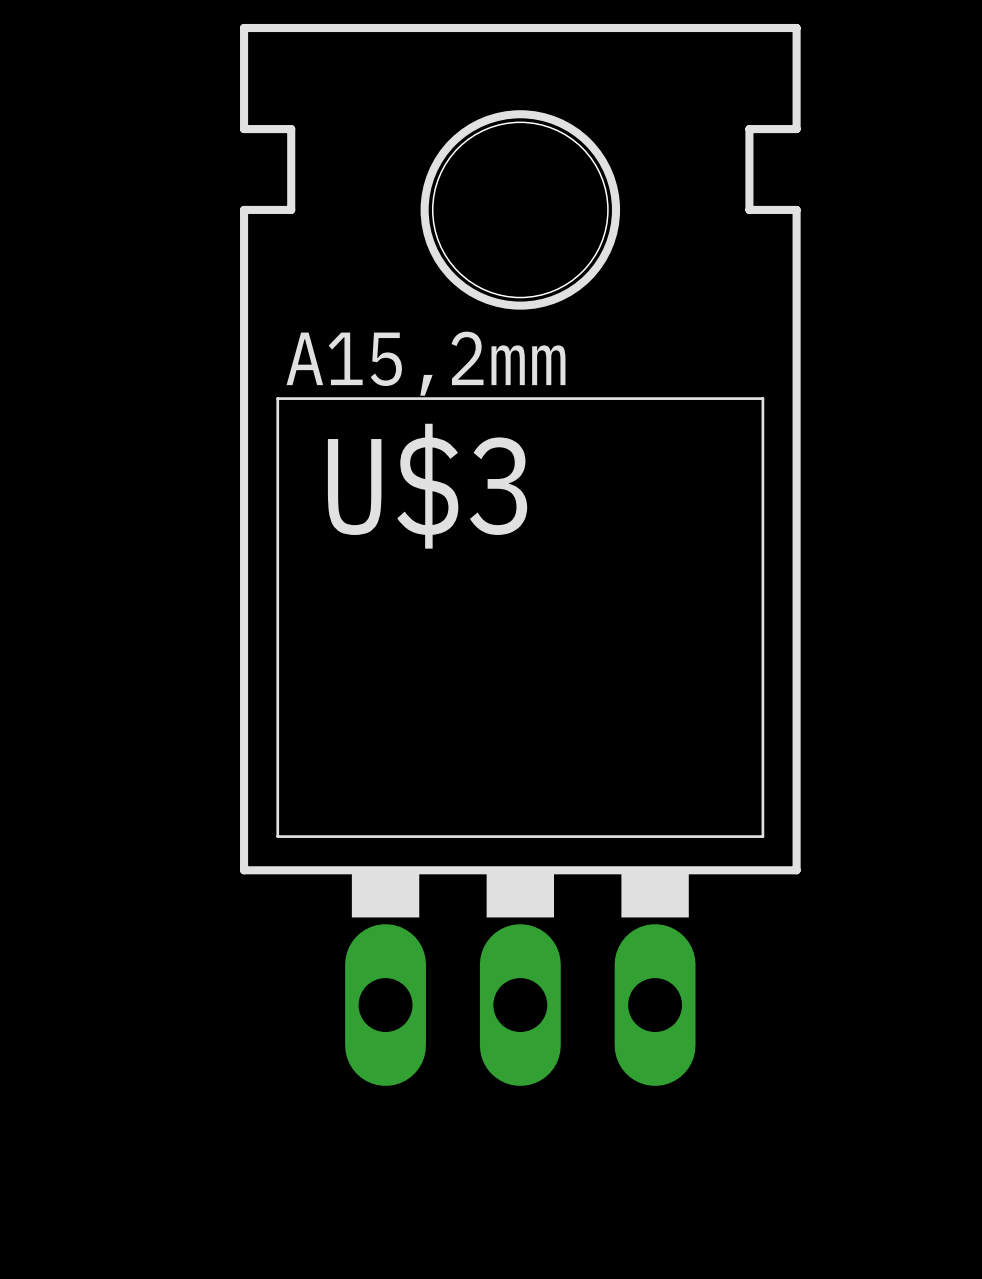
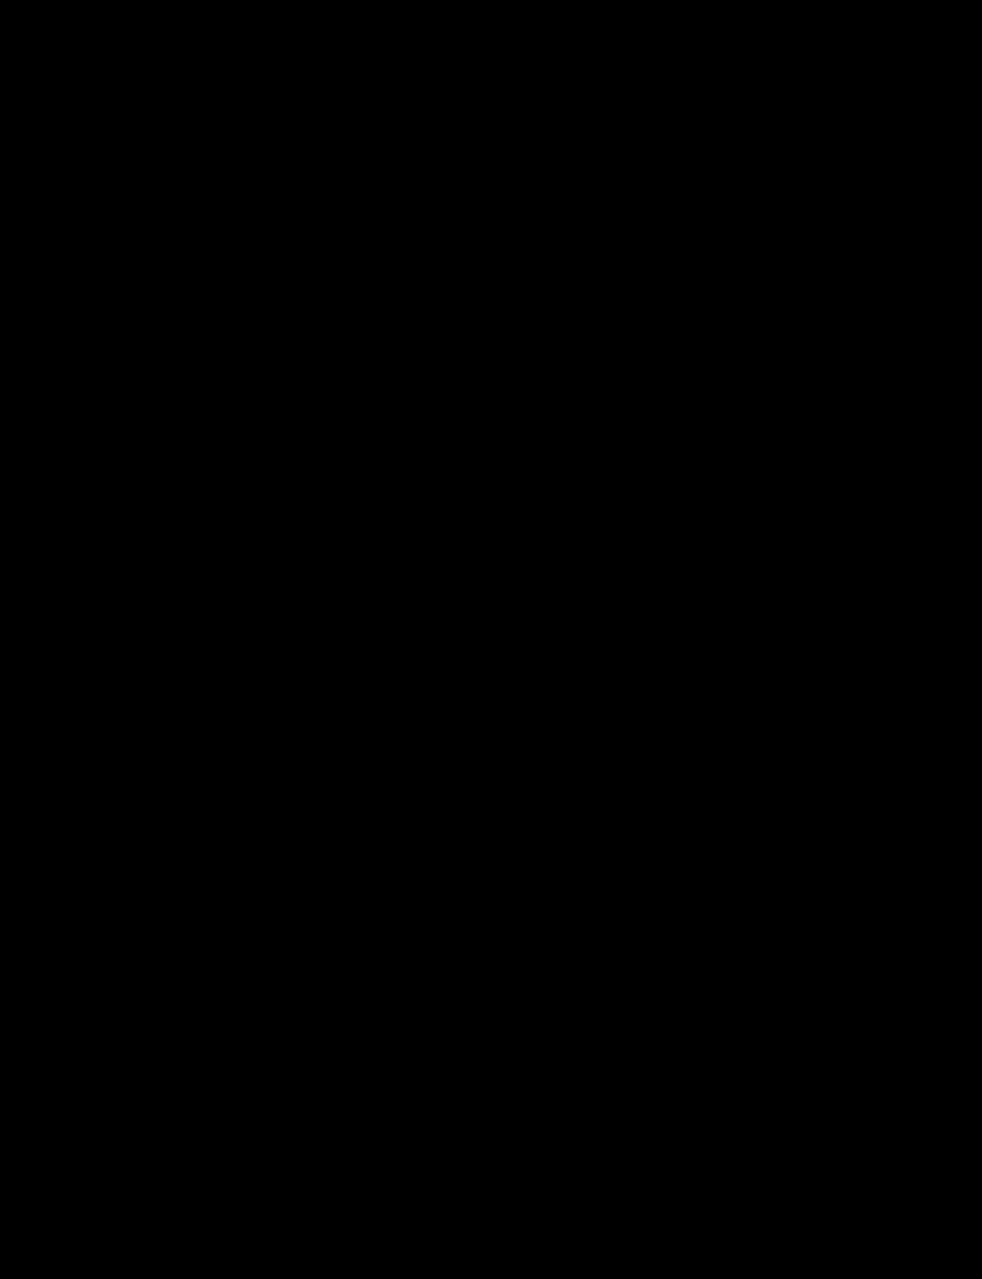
U$3: (520, 554) -> none

